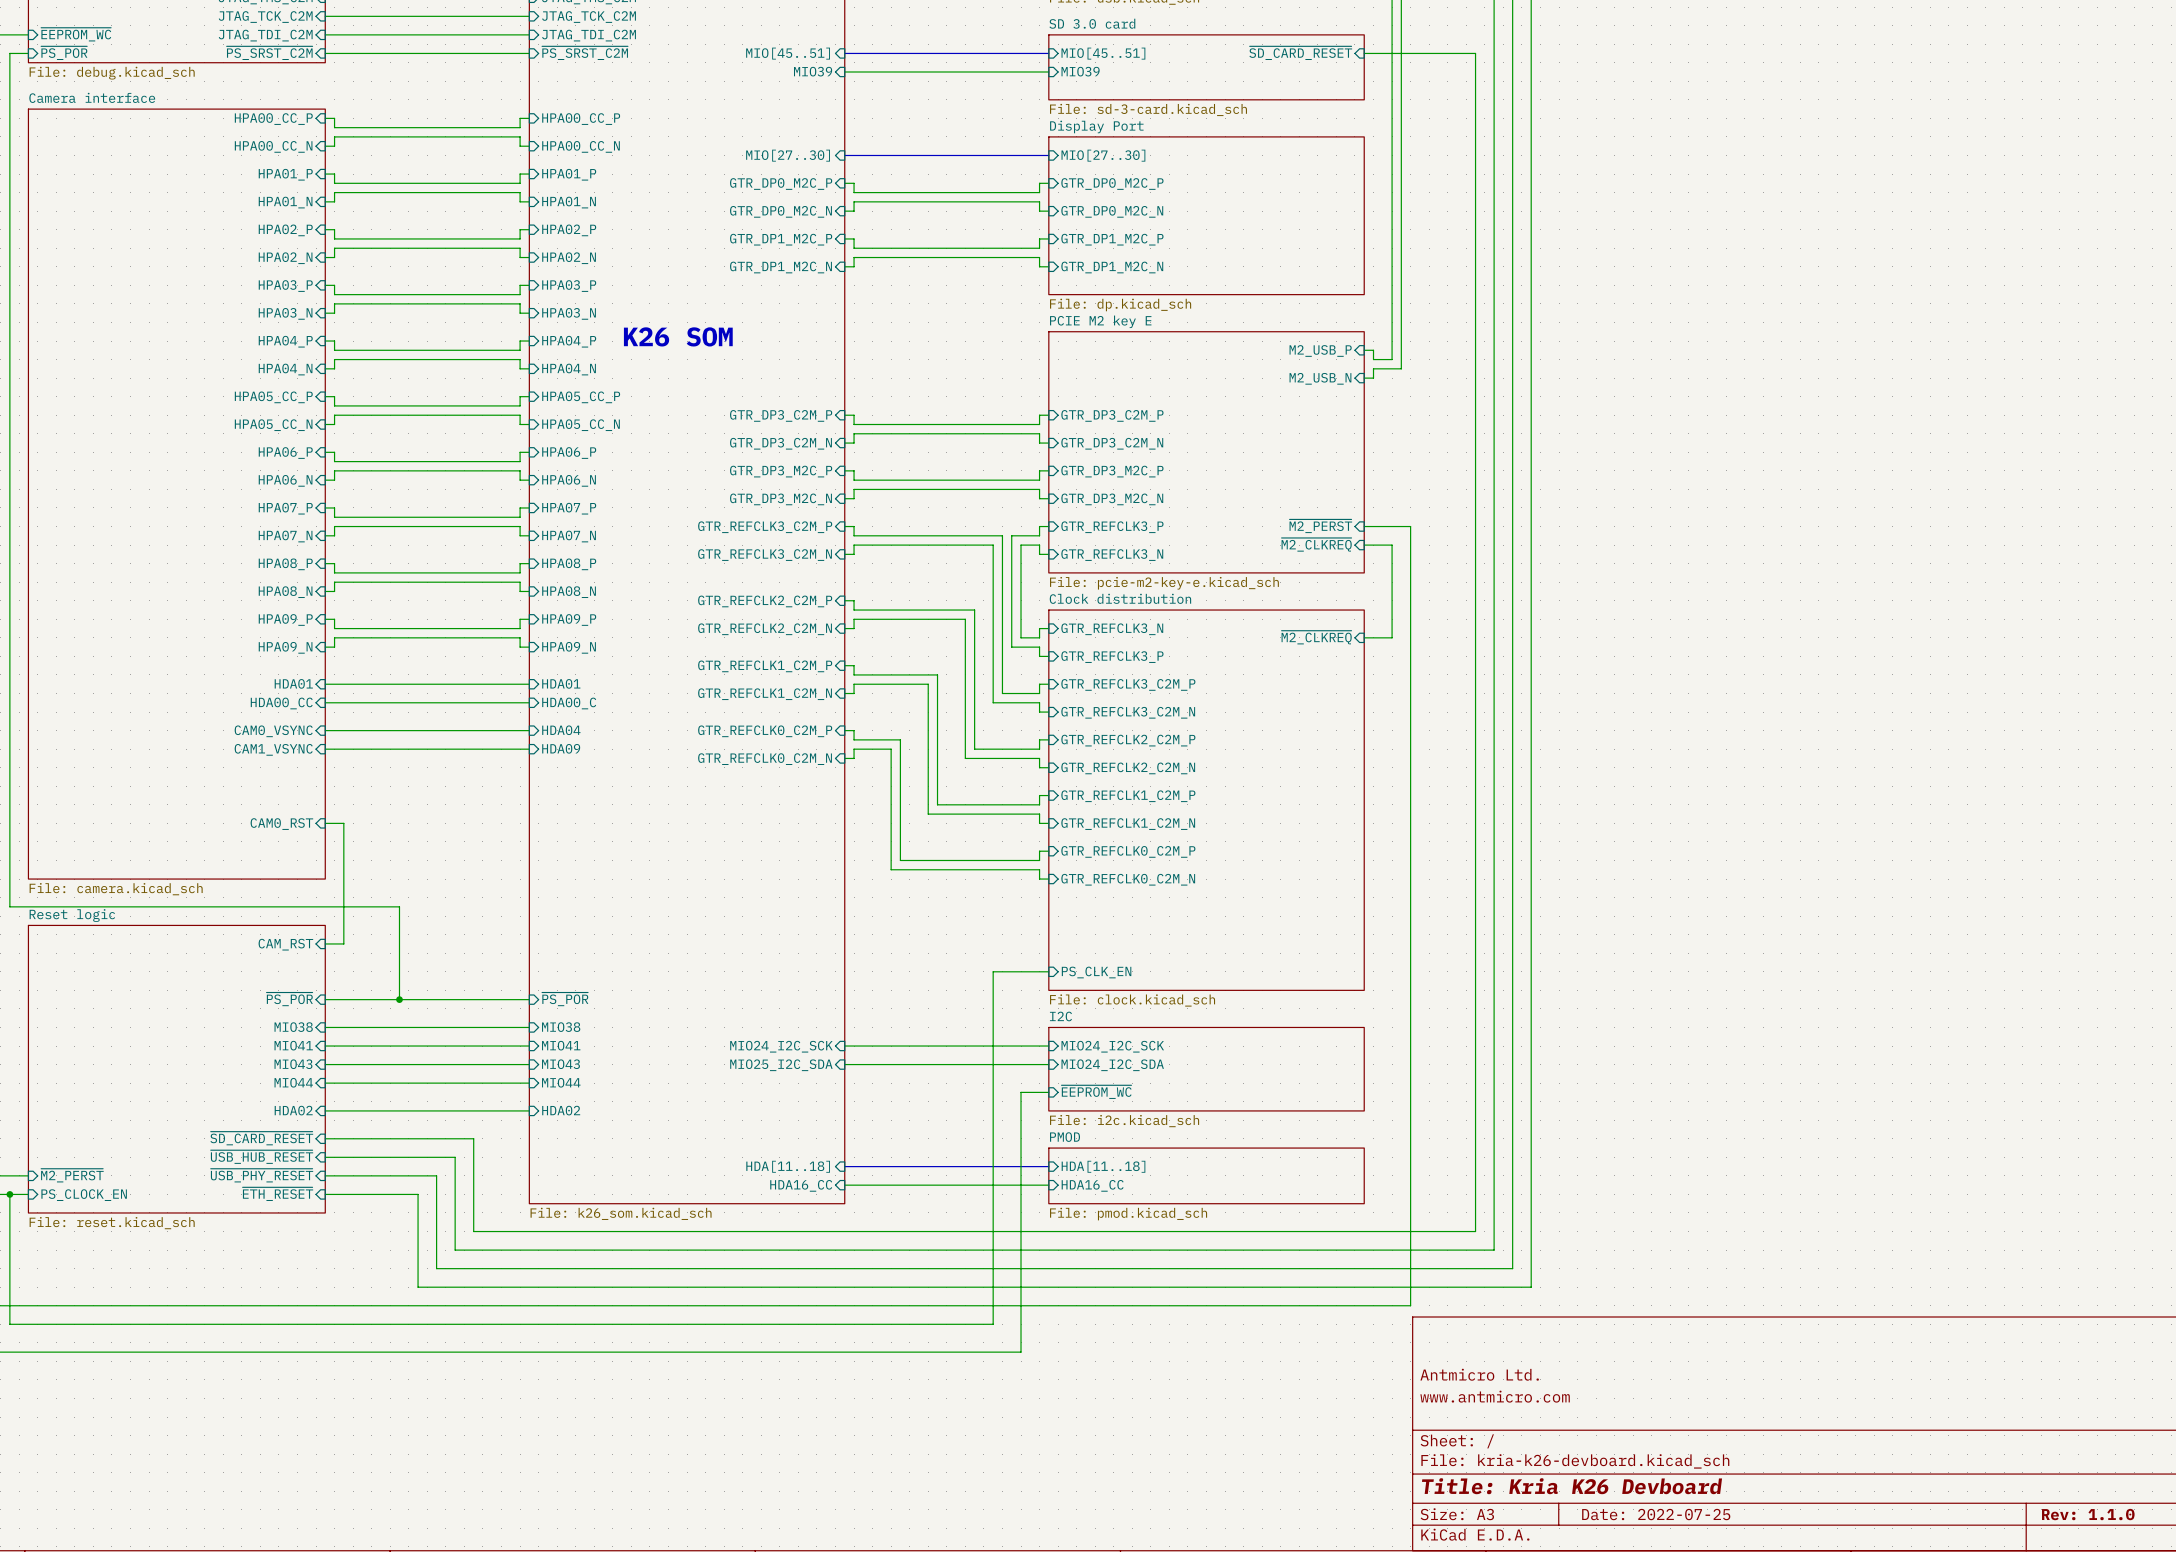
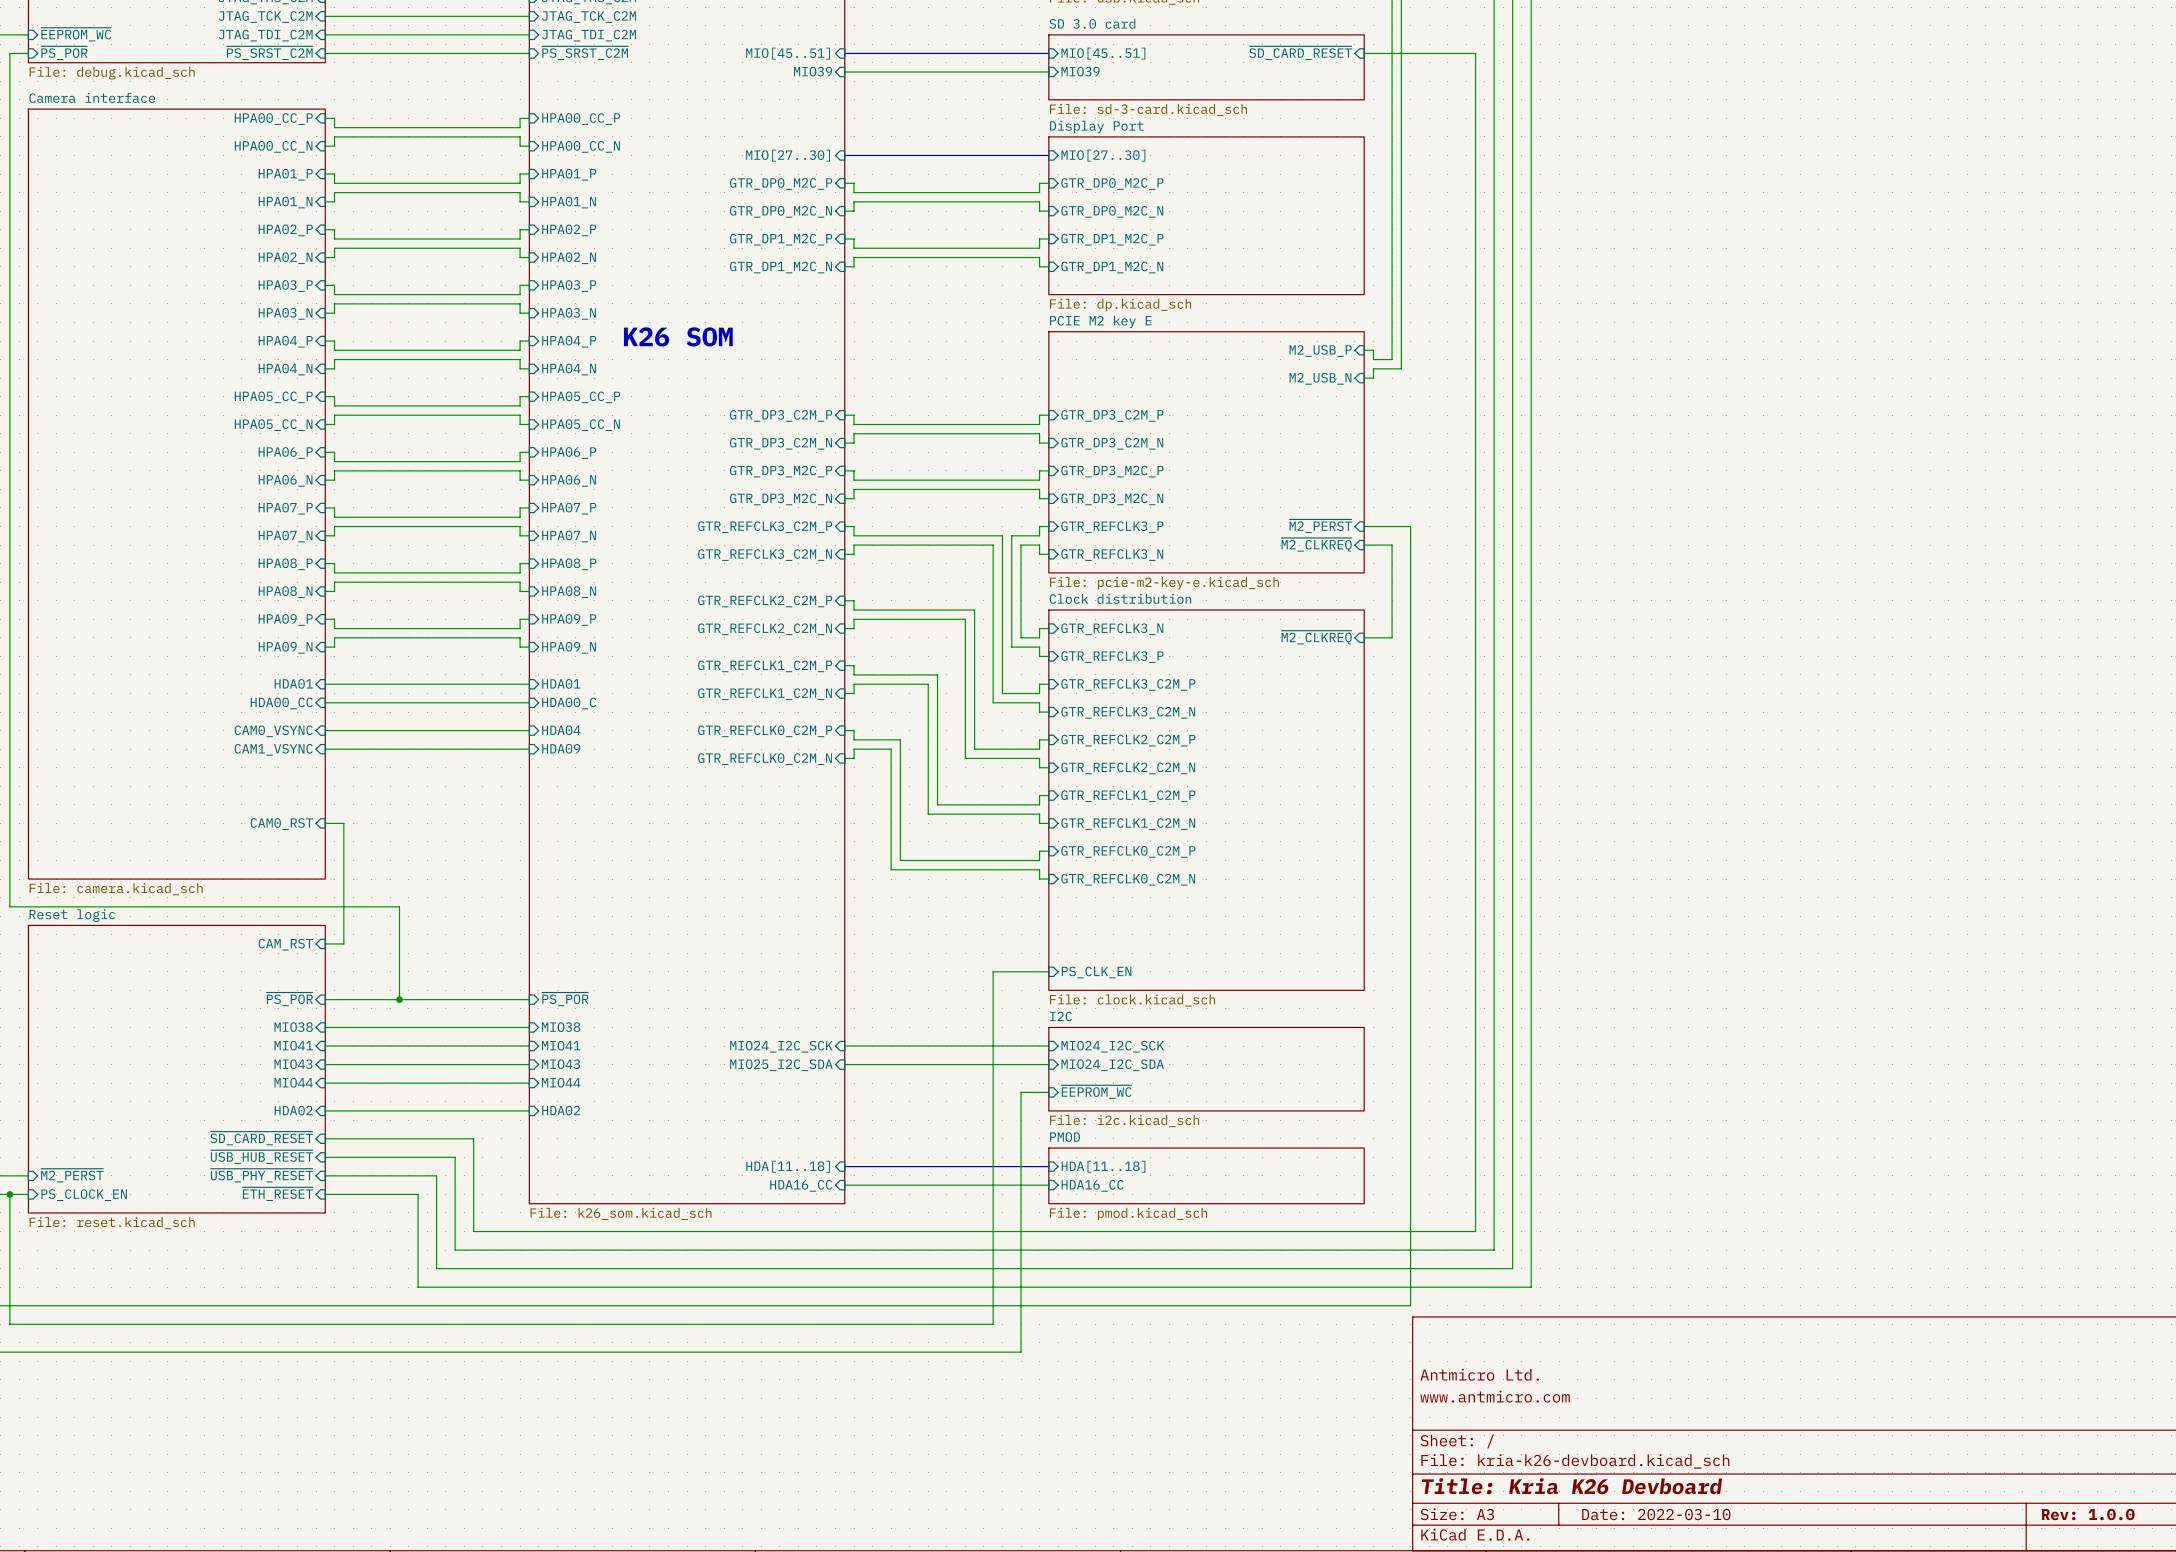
title block: Date: 2022-07-25 (1656, 1514) -> Date: 2022-03-10 (1656, 1514)
title block: Rev: 1.1.0 (2088, 1514) -> Rev: 1.0.0 (2088, 1514)

